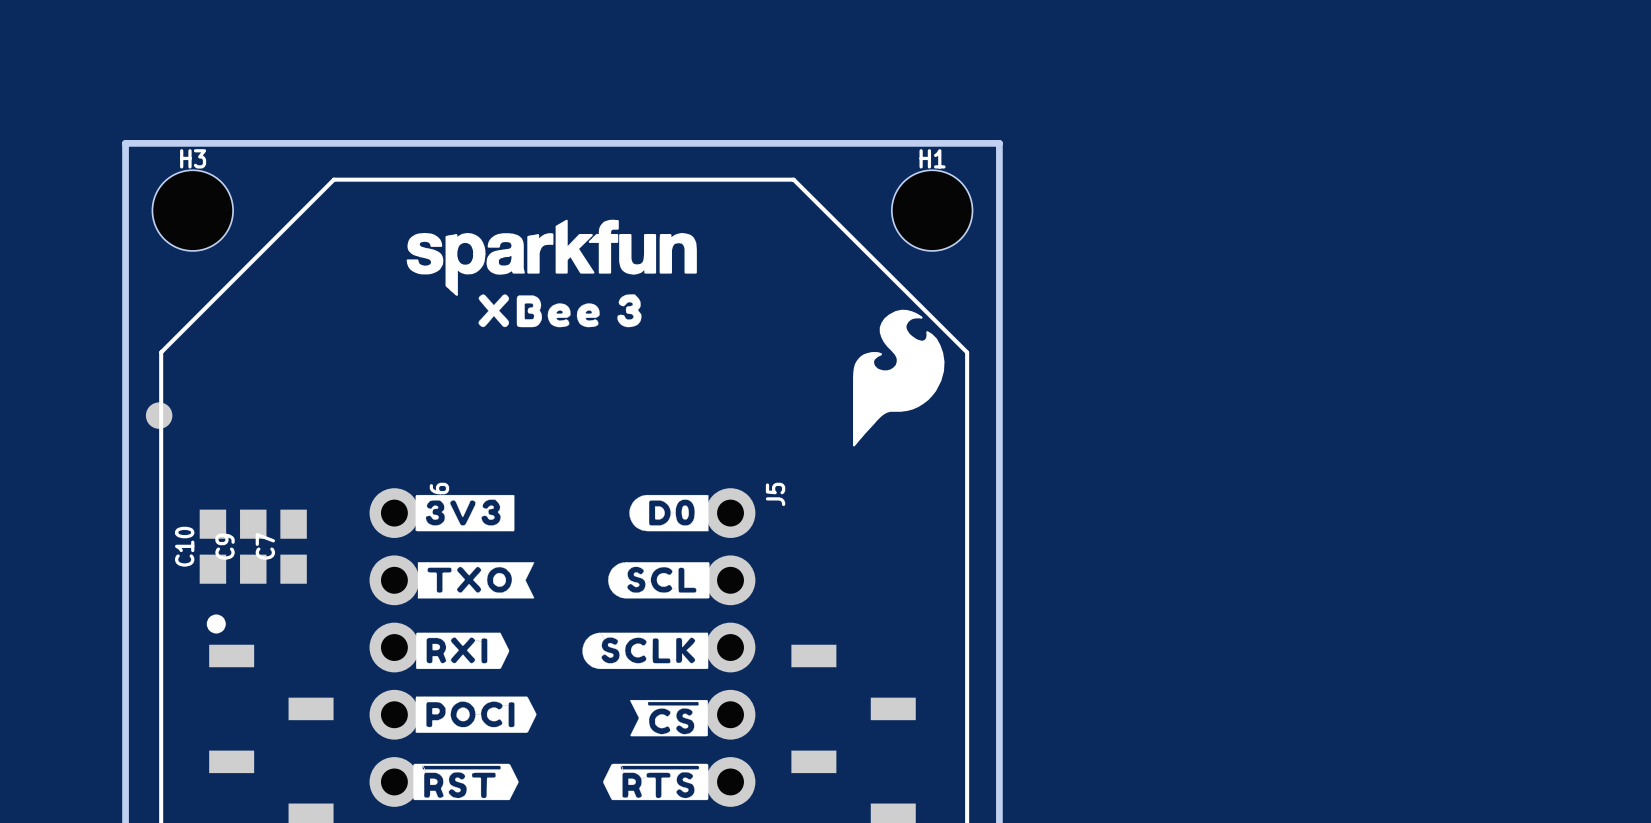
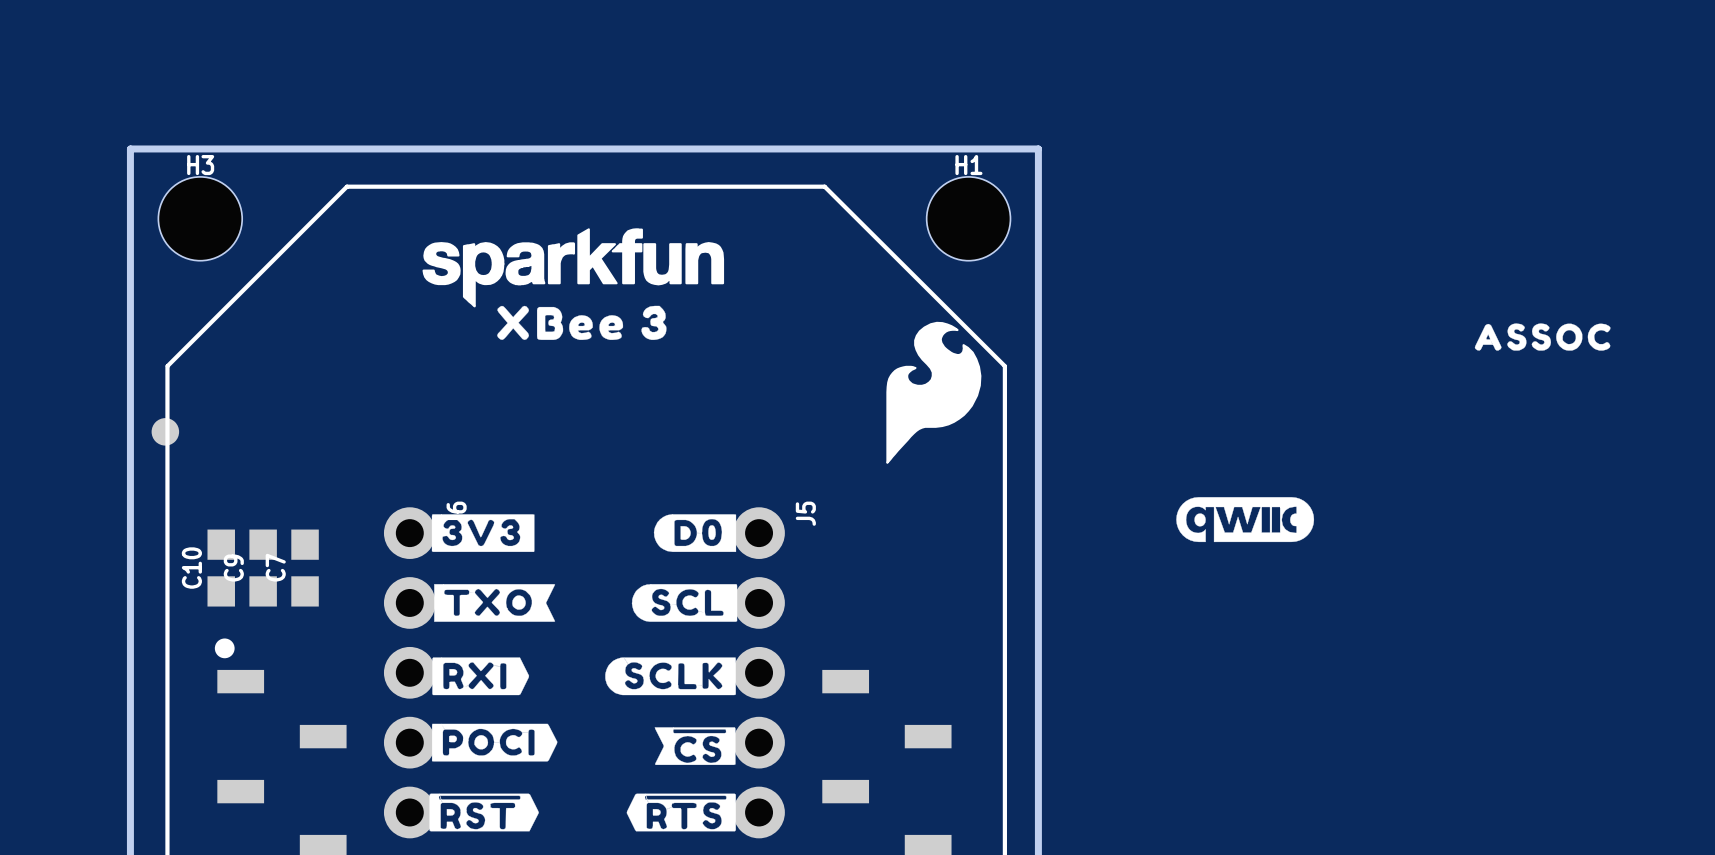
drawing: none -> [1474, 323, 1611, 351]
drawing: none -> [1176, 497, 1315, 543]

